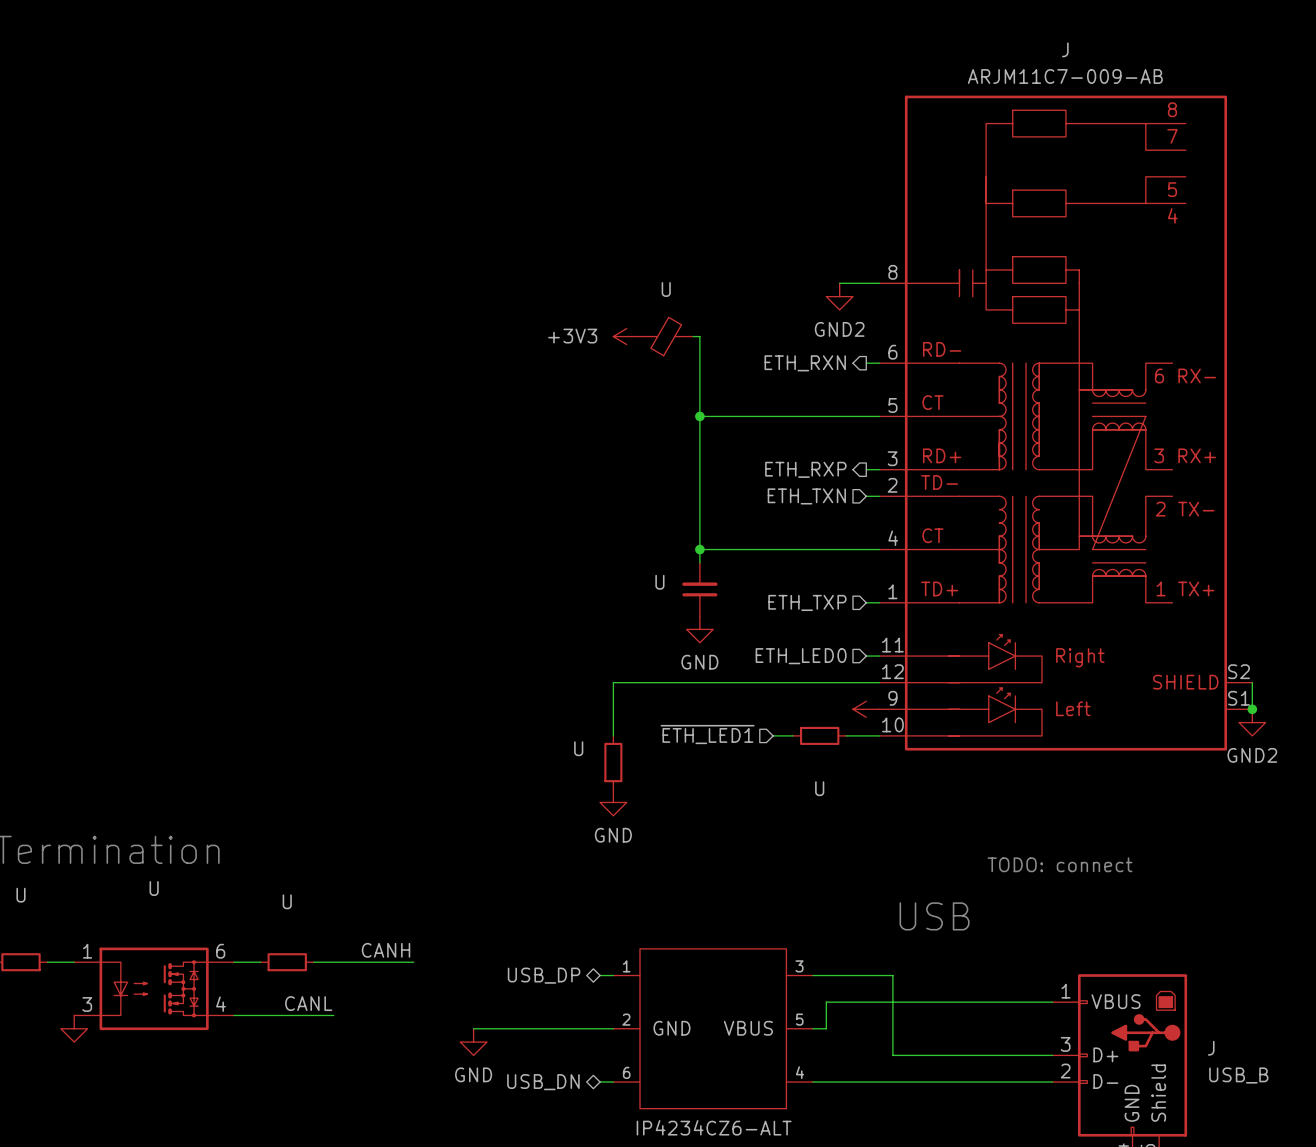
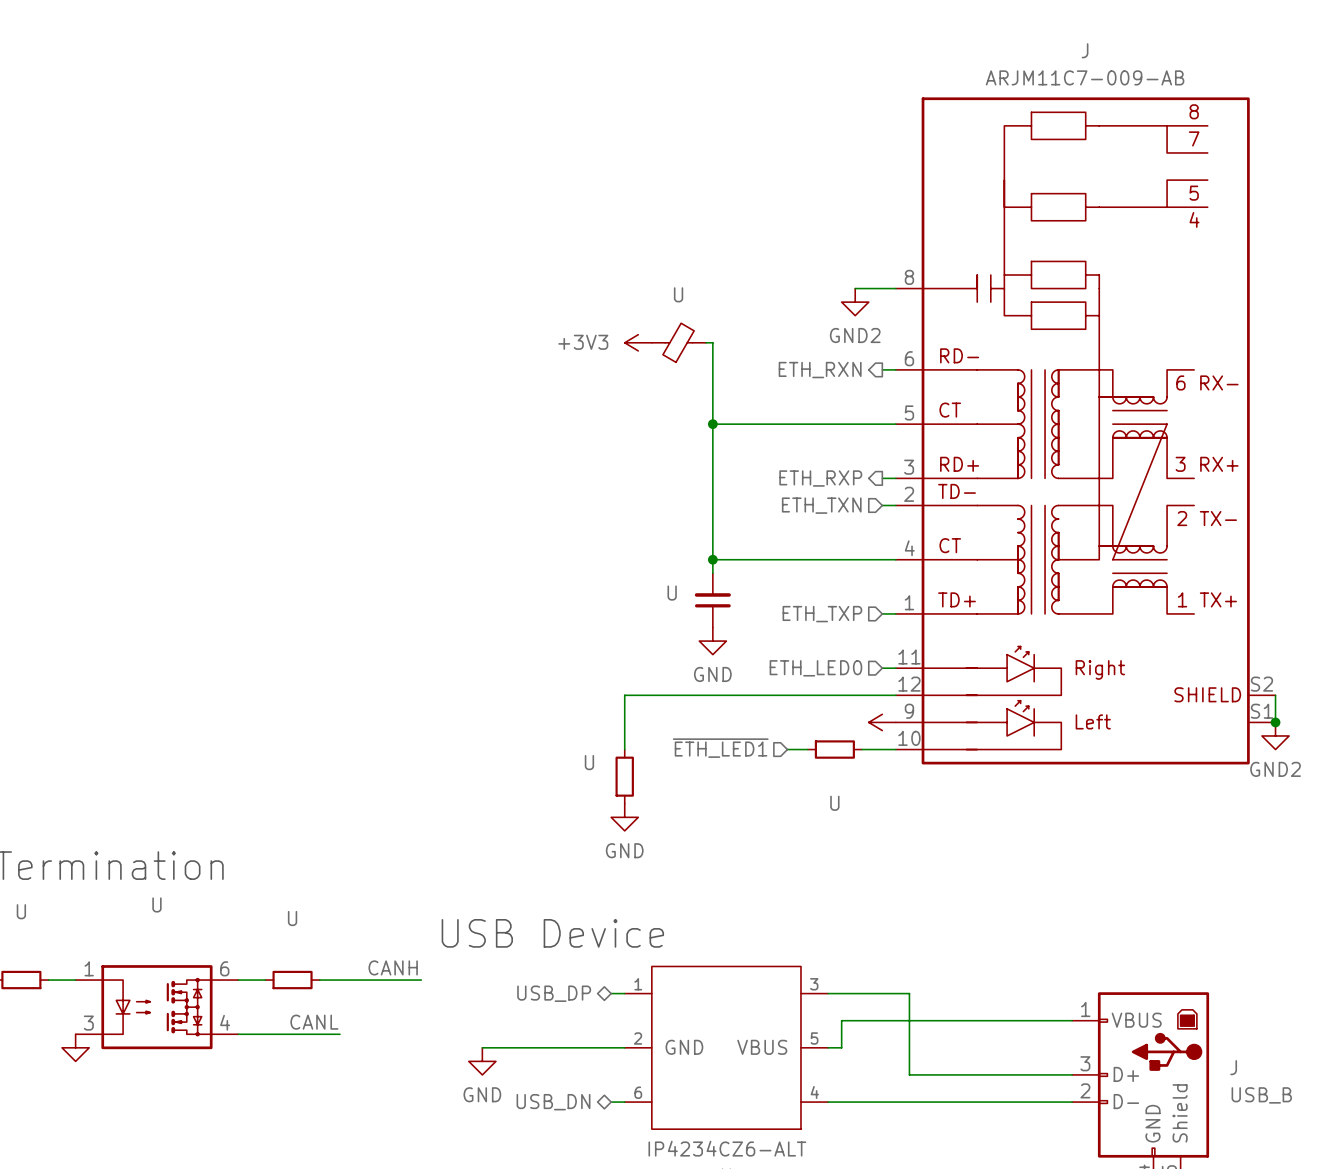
text: TODO: connect (1060, 864) -> none
text: none -> USB Device (552, 933)
text: USB (934, 916) -> none

